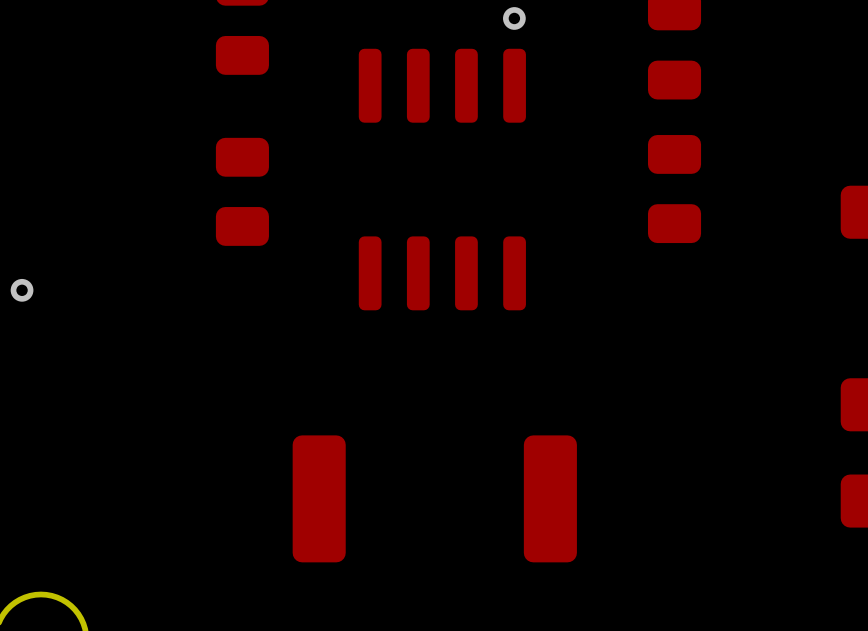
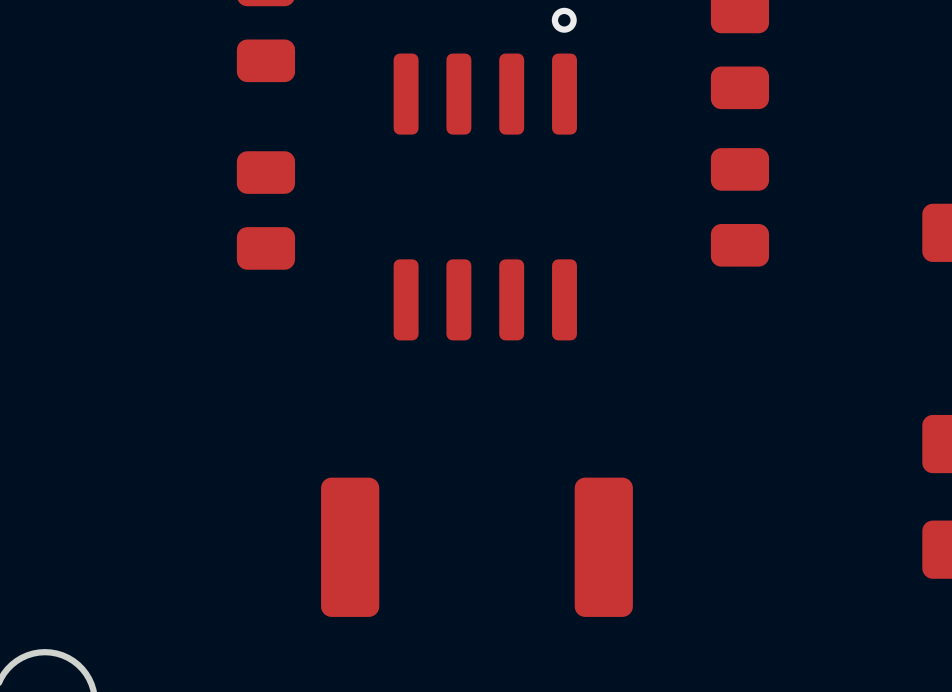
via: (22, 290) -> none

